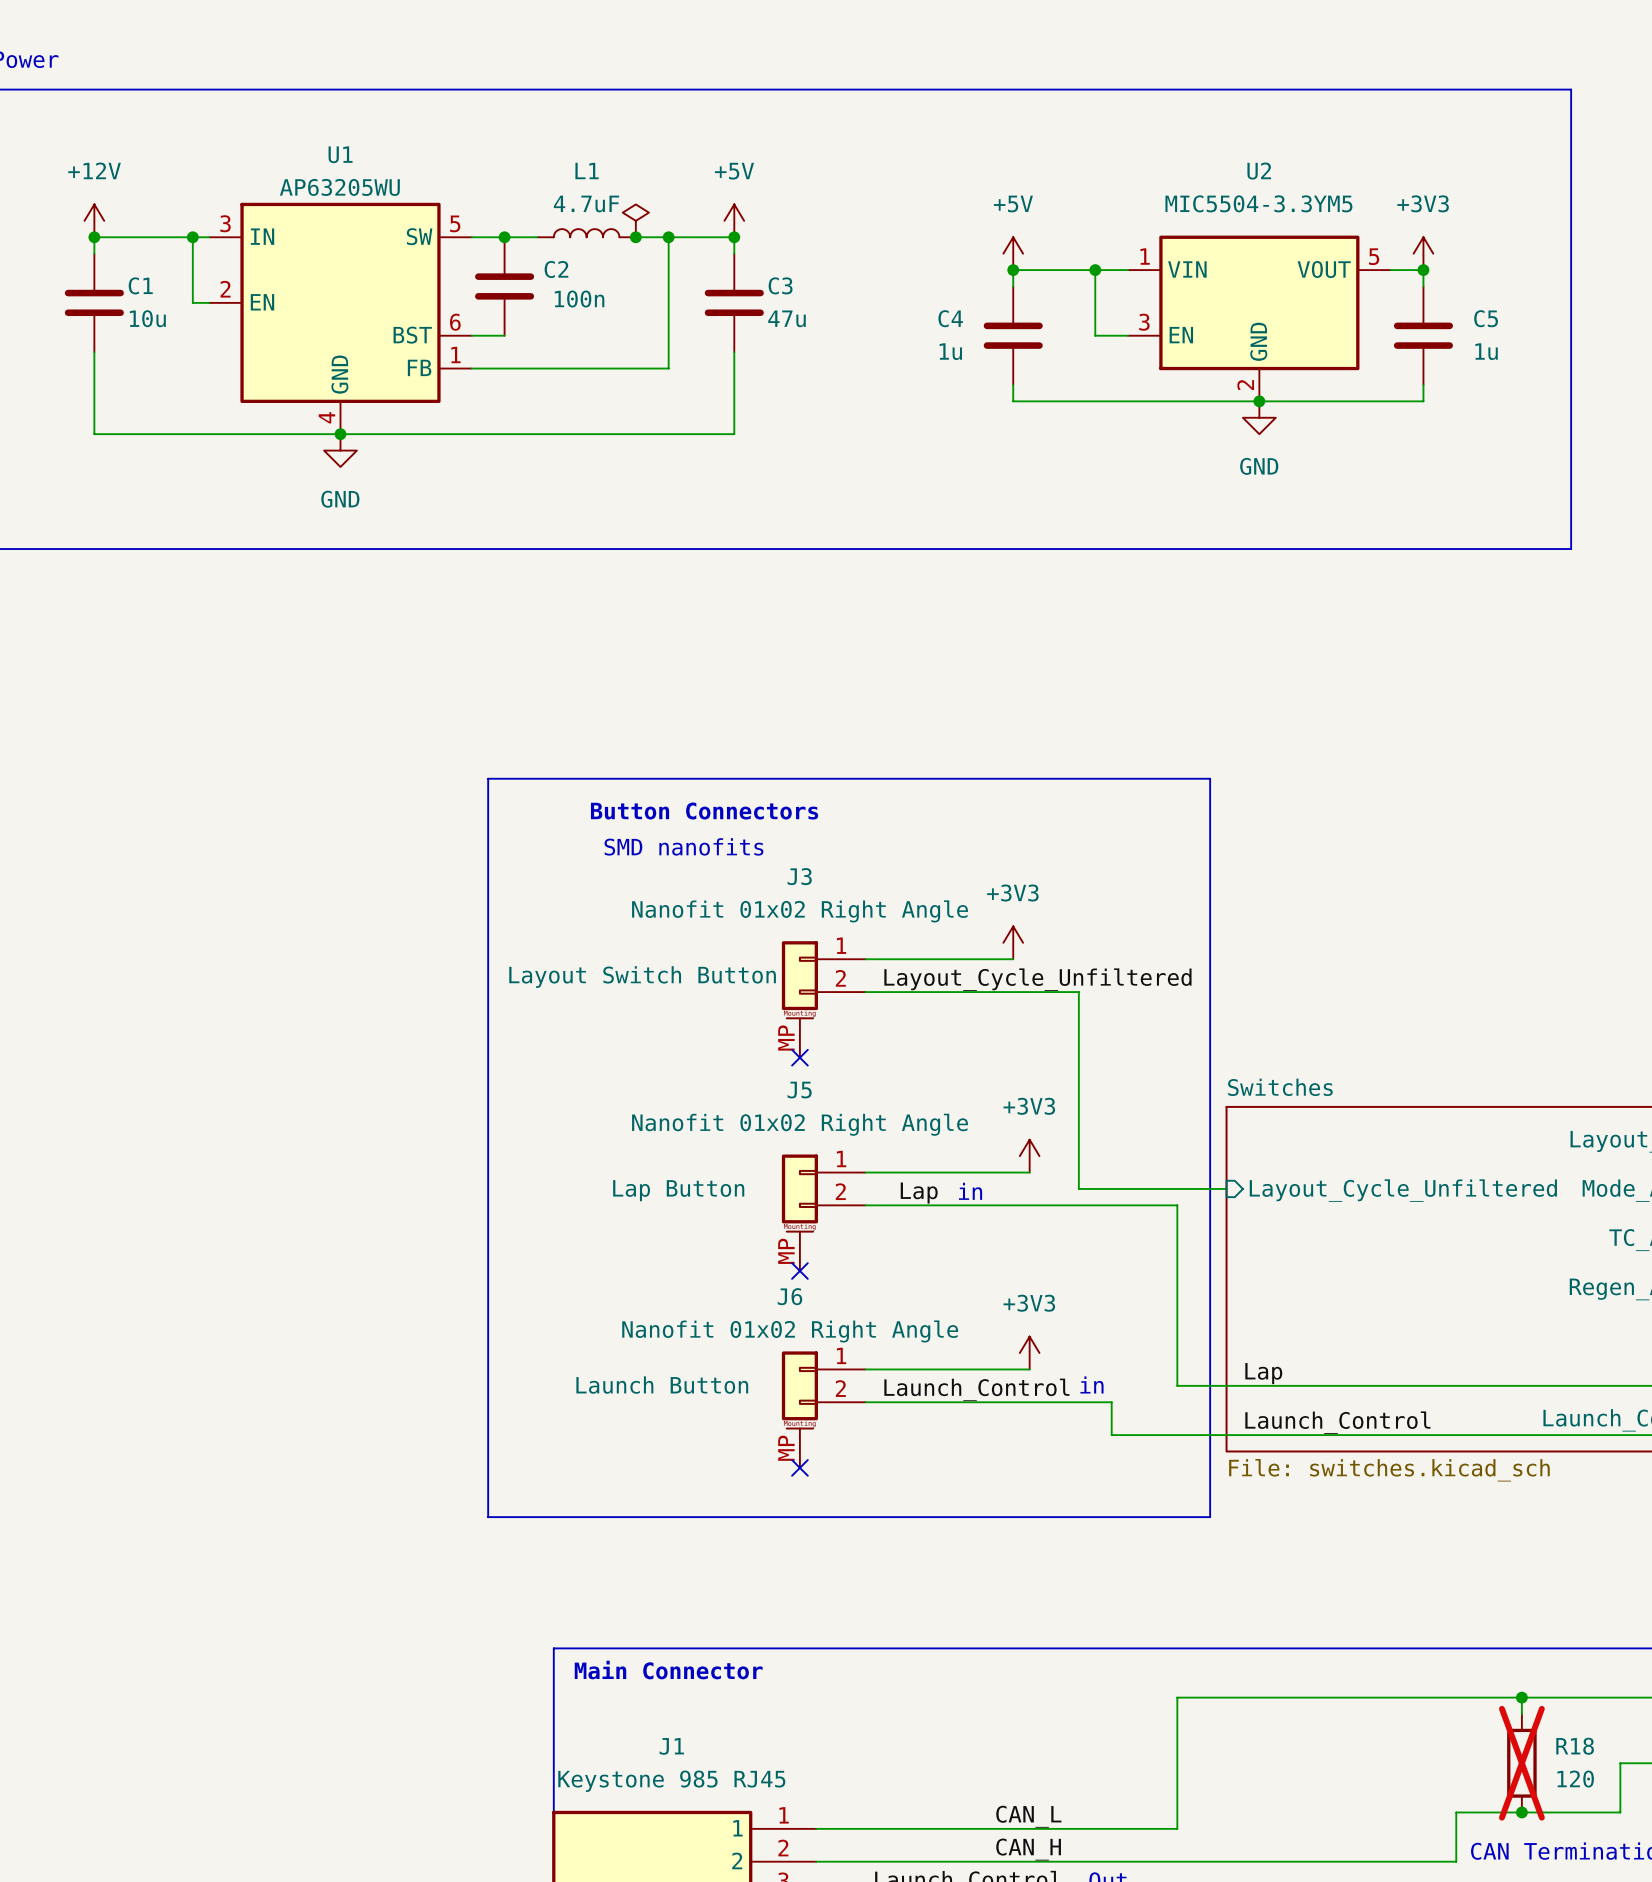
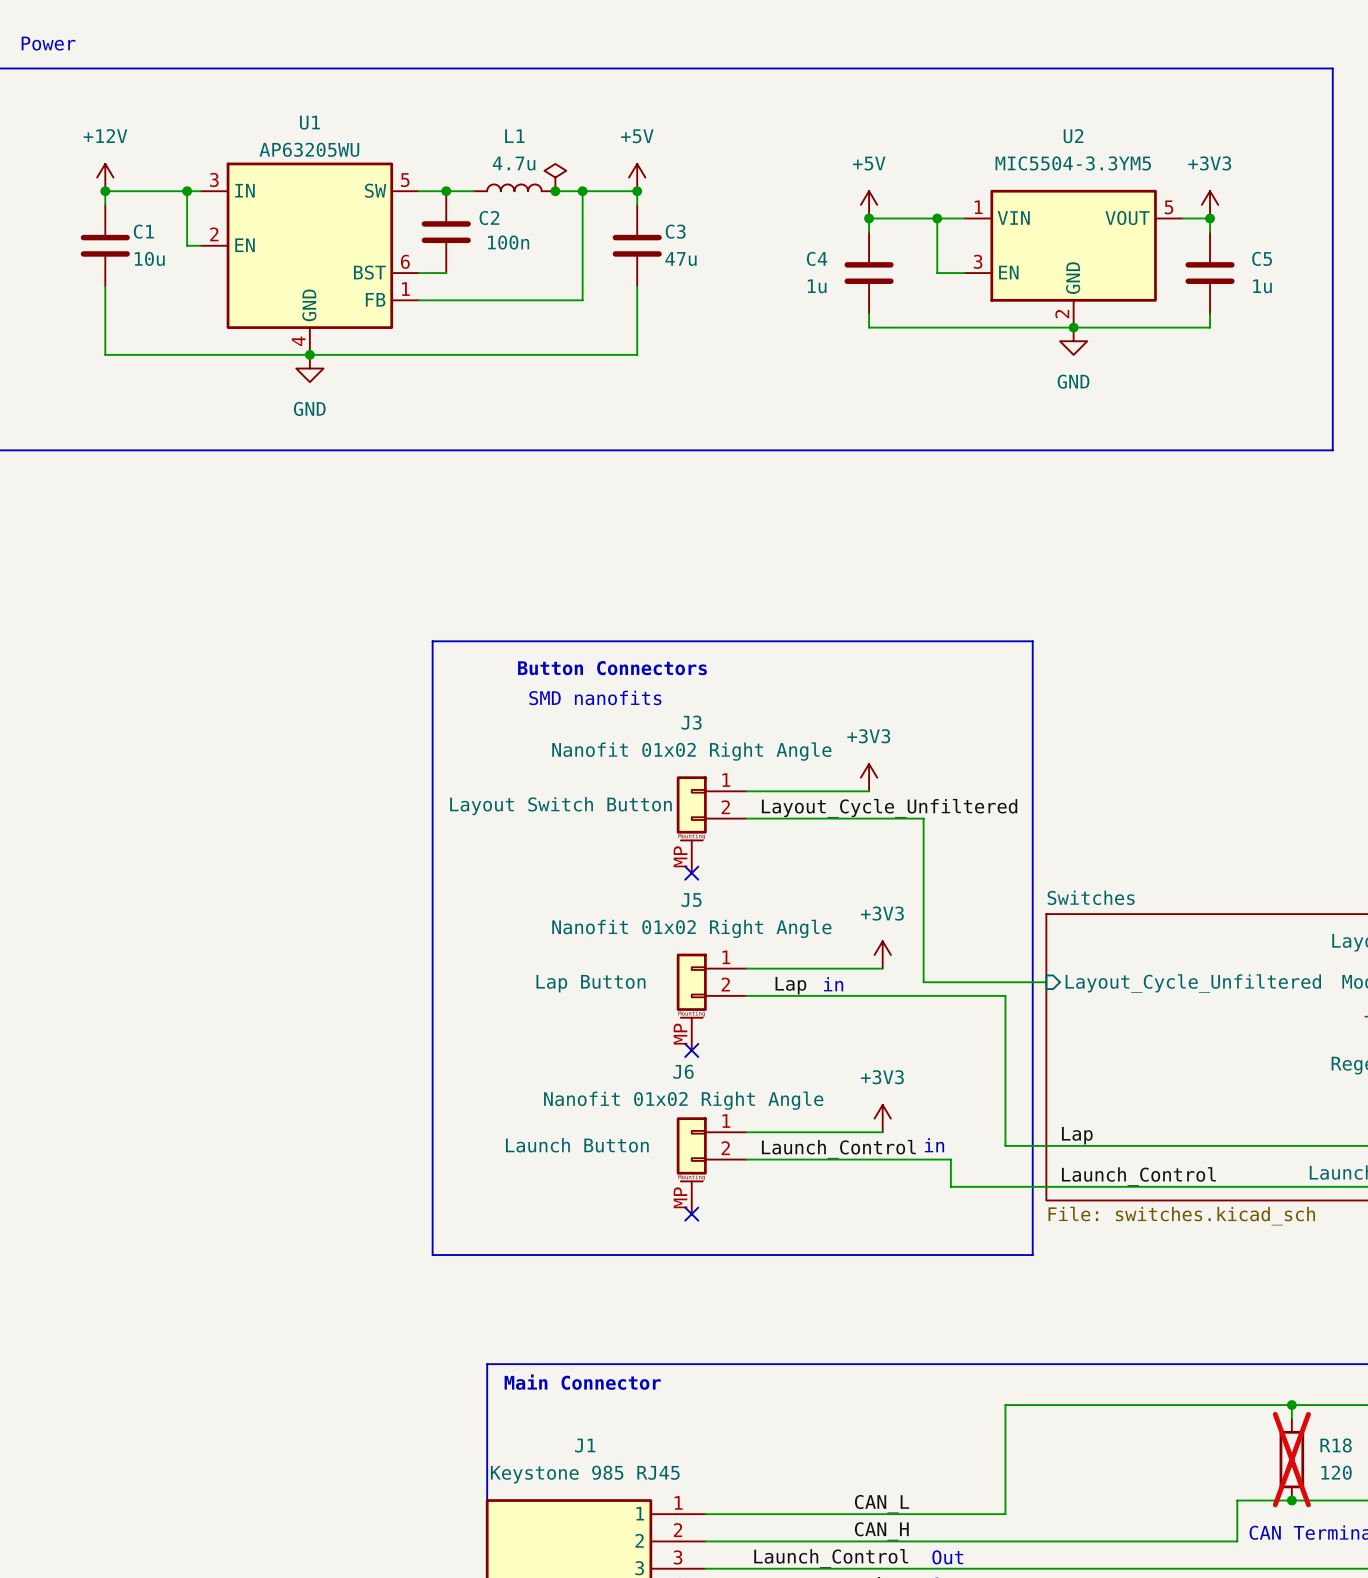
L1 value: 4.7uF (586, 204) -> 4.7u (514, 163)

